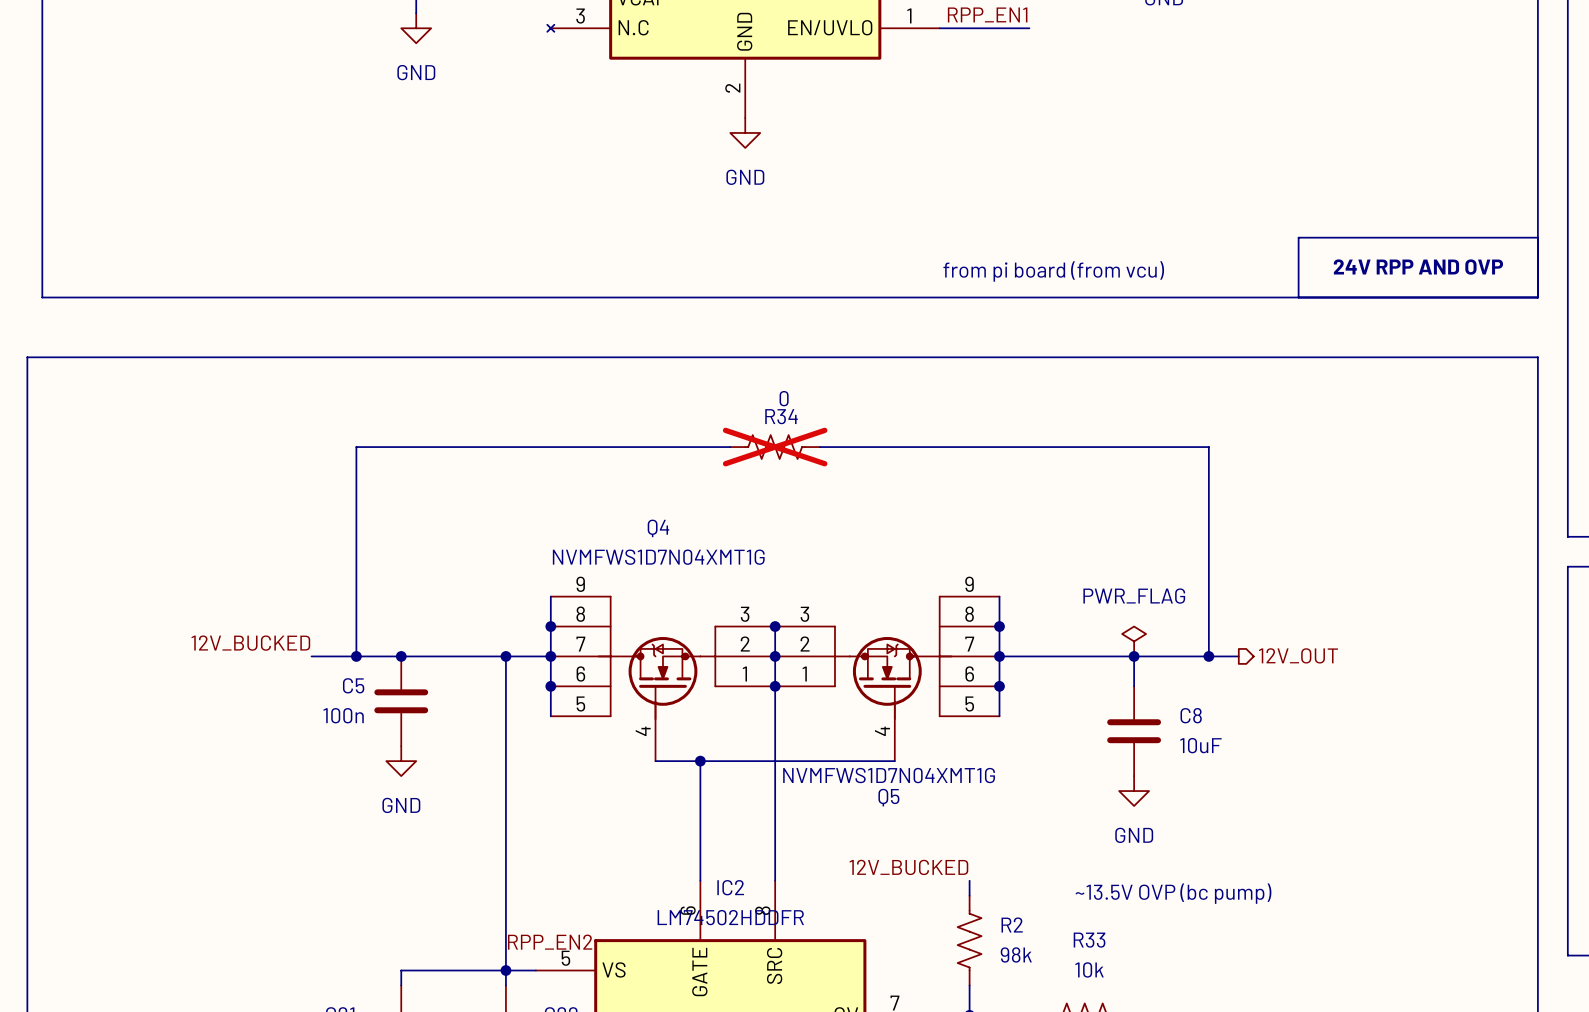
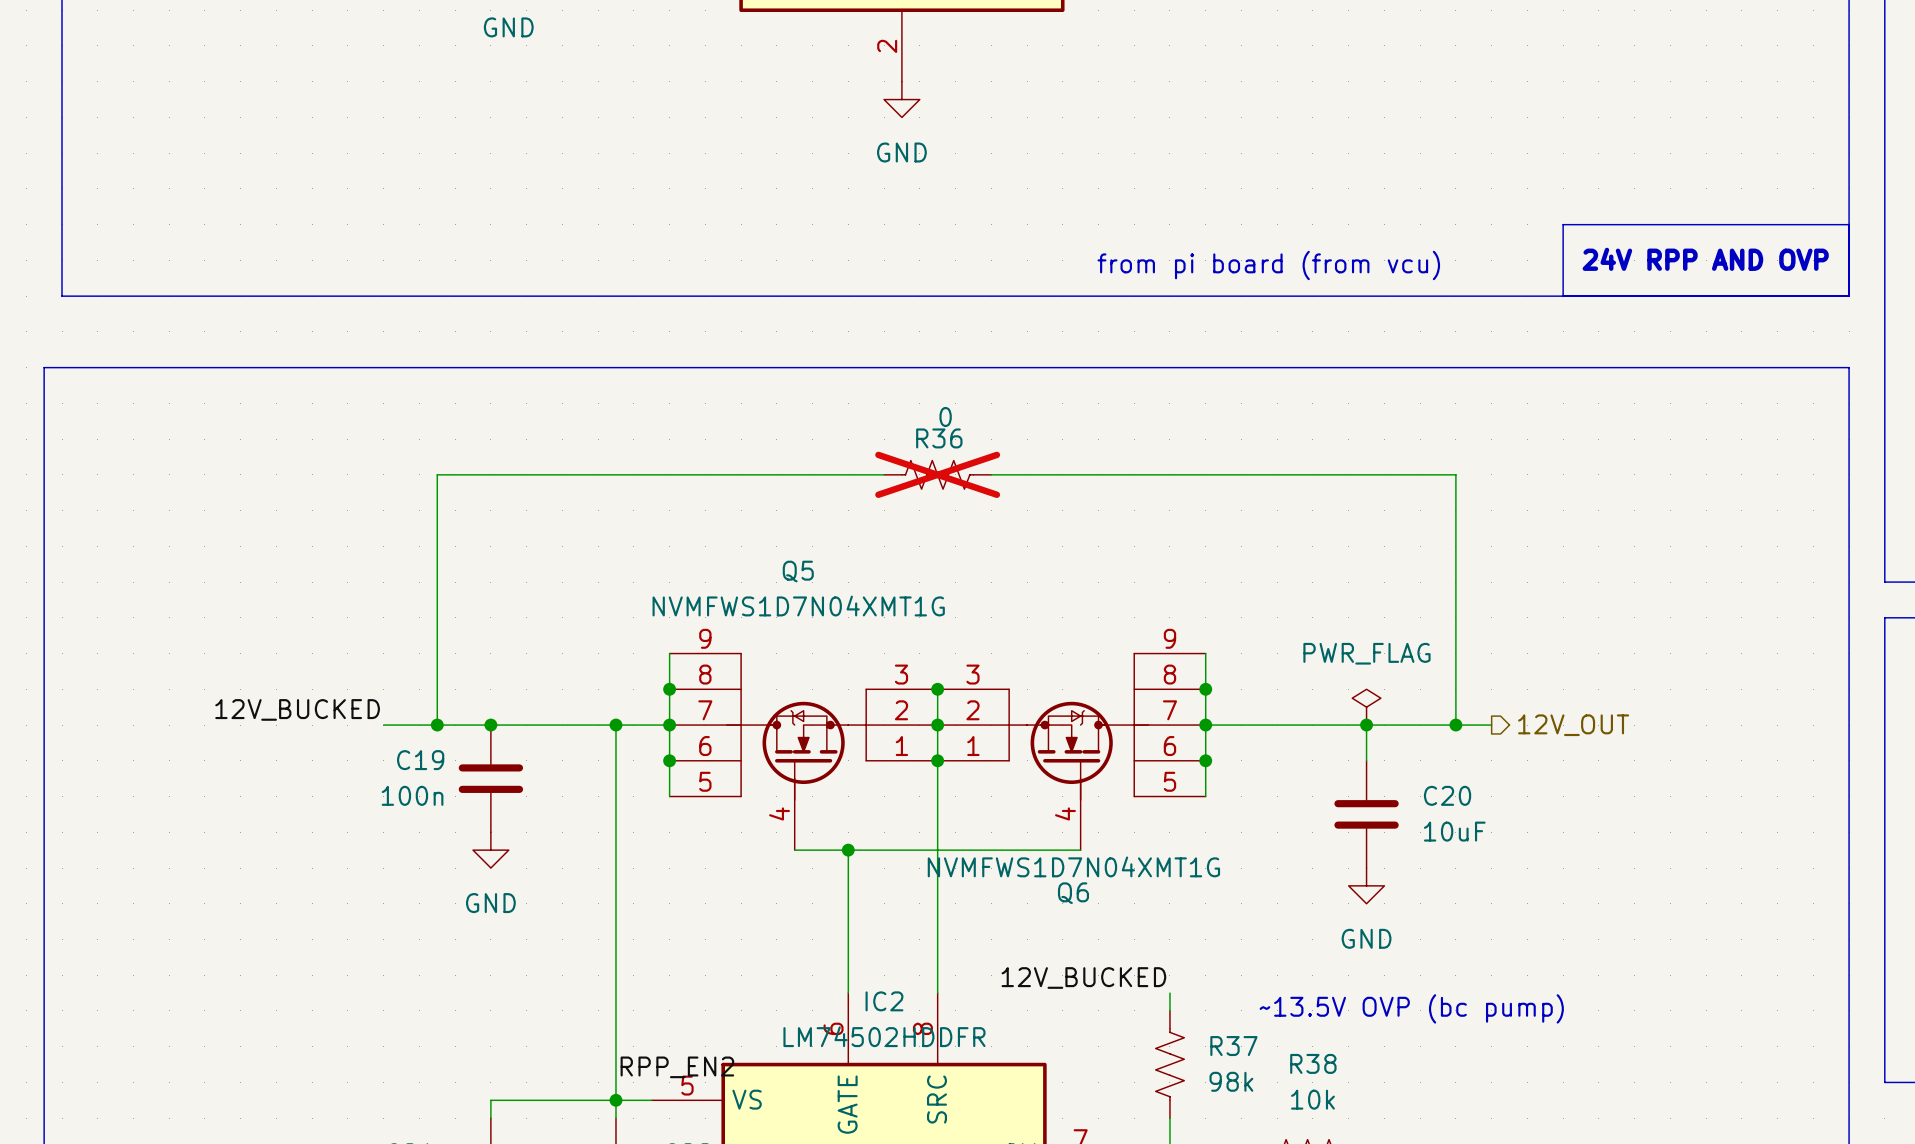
R34 name: R34 (781, 416) -> R36 (939, 438)
Q4 name: Q4 (658, 528) -> Q5 (798, 571)
C5 name: C5 (353, 685) -> C19 (420, 760)
C8 name: C8 (1191, 715) -> C20 (1447, 795)
Q5 name: Q5 (888, 797) -> Q6 (1073, 893)
R2 name: R2 (1012, 925) -> R37 (1233, 1046)
R33 name: R33 (1089, 940) -> R38 (1313, 1063)

